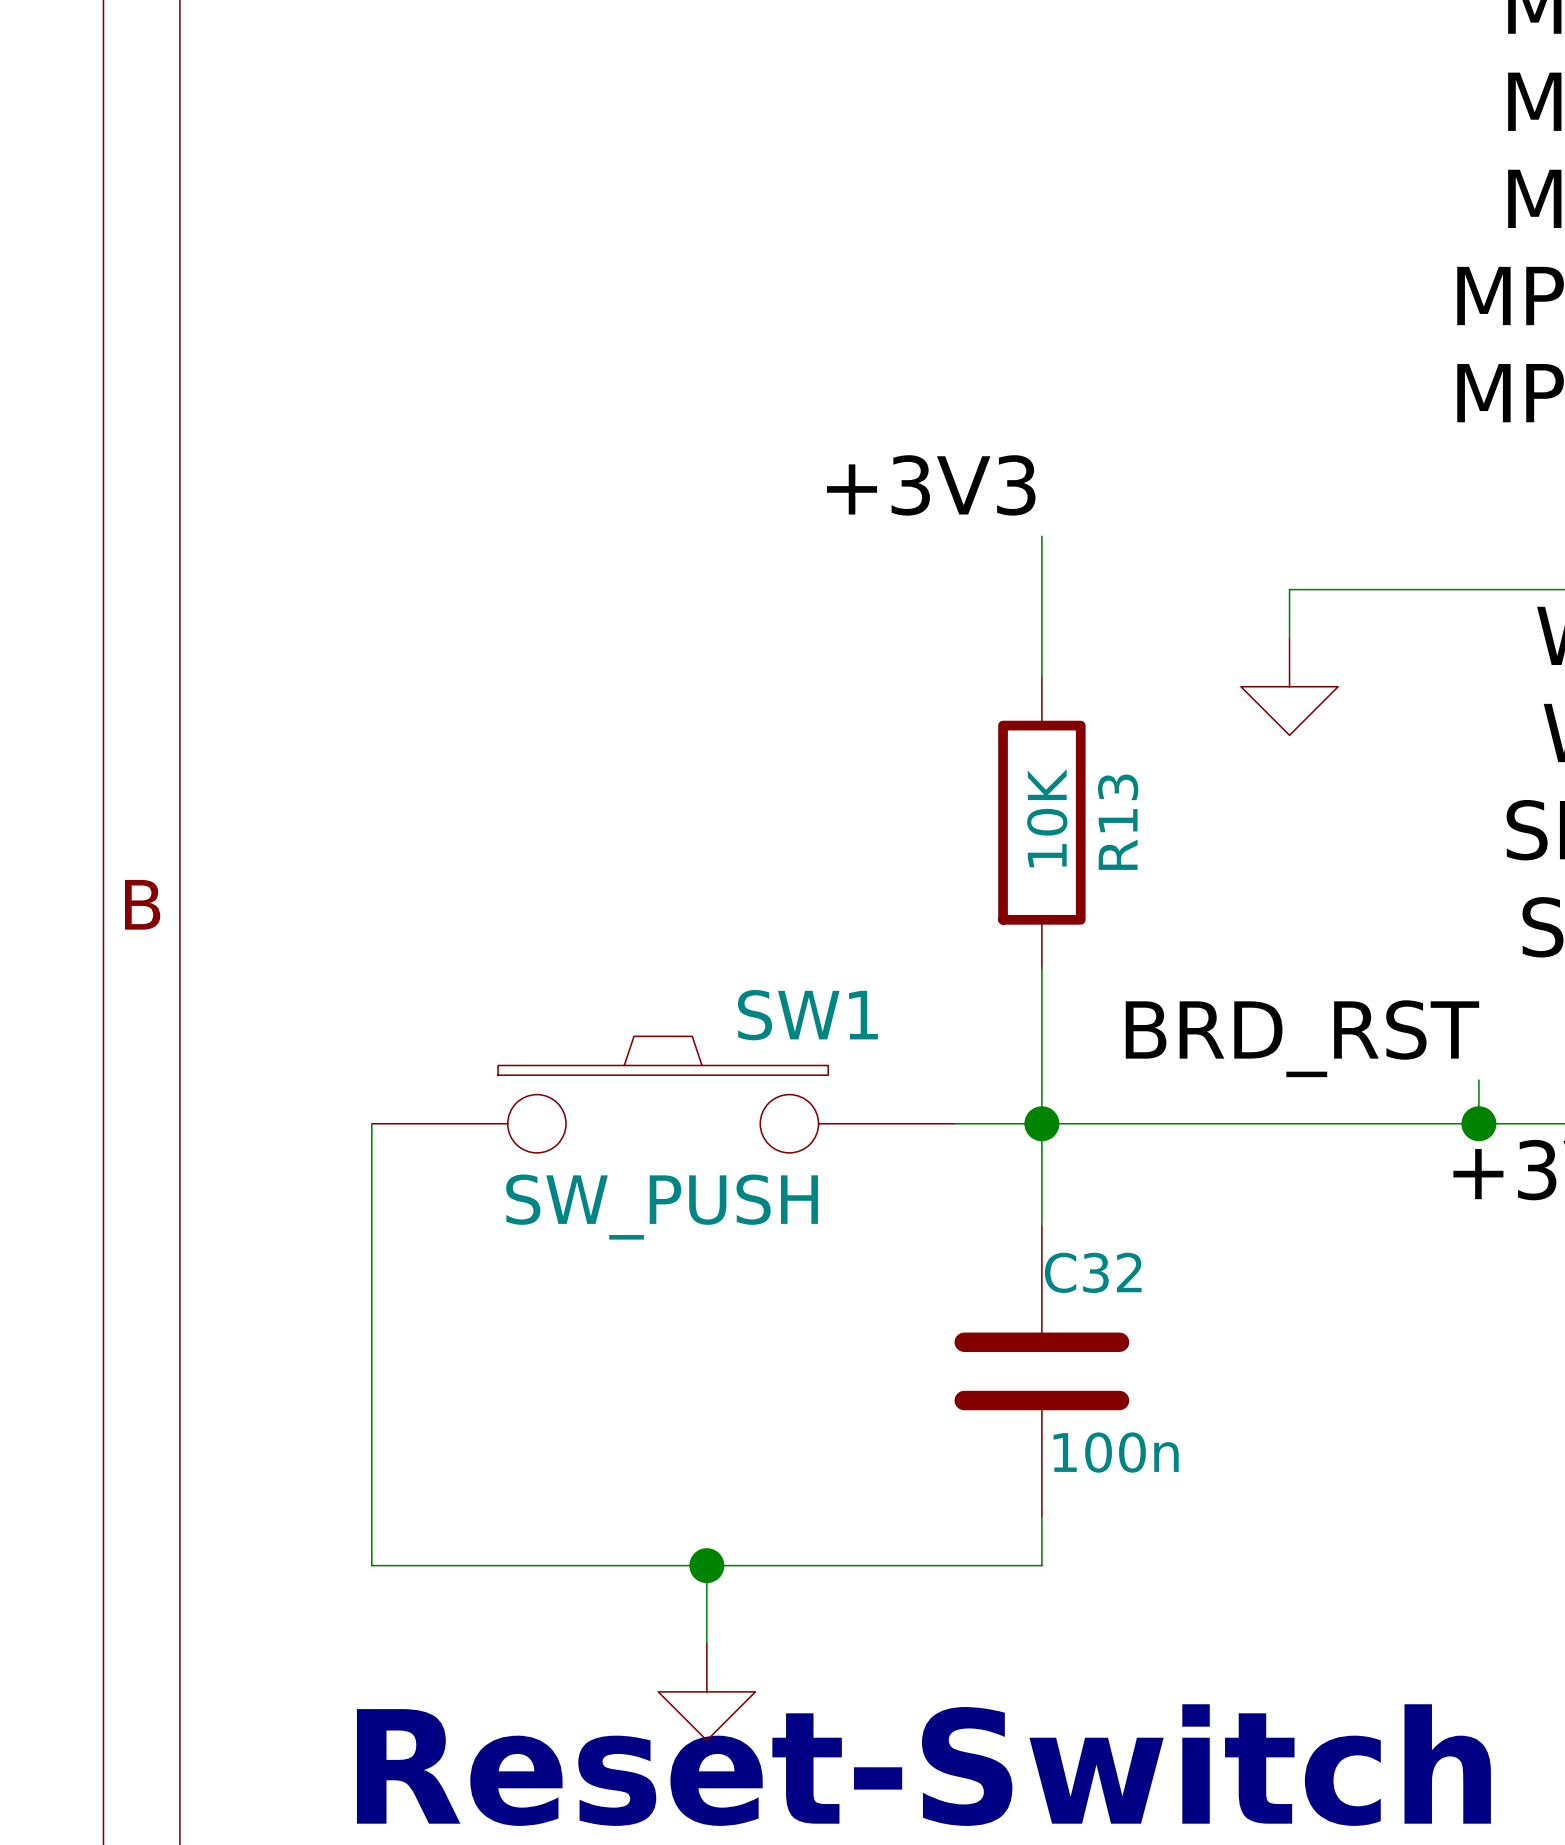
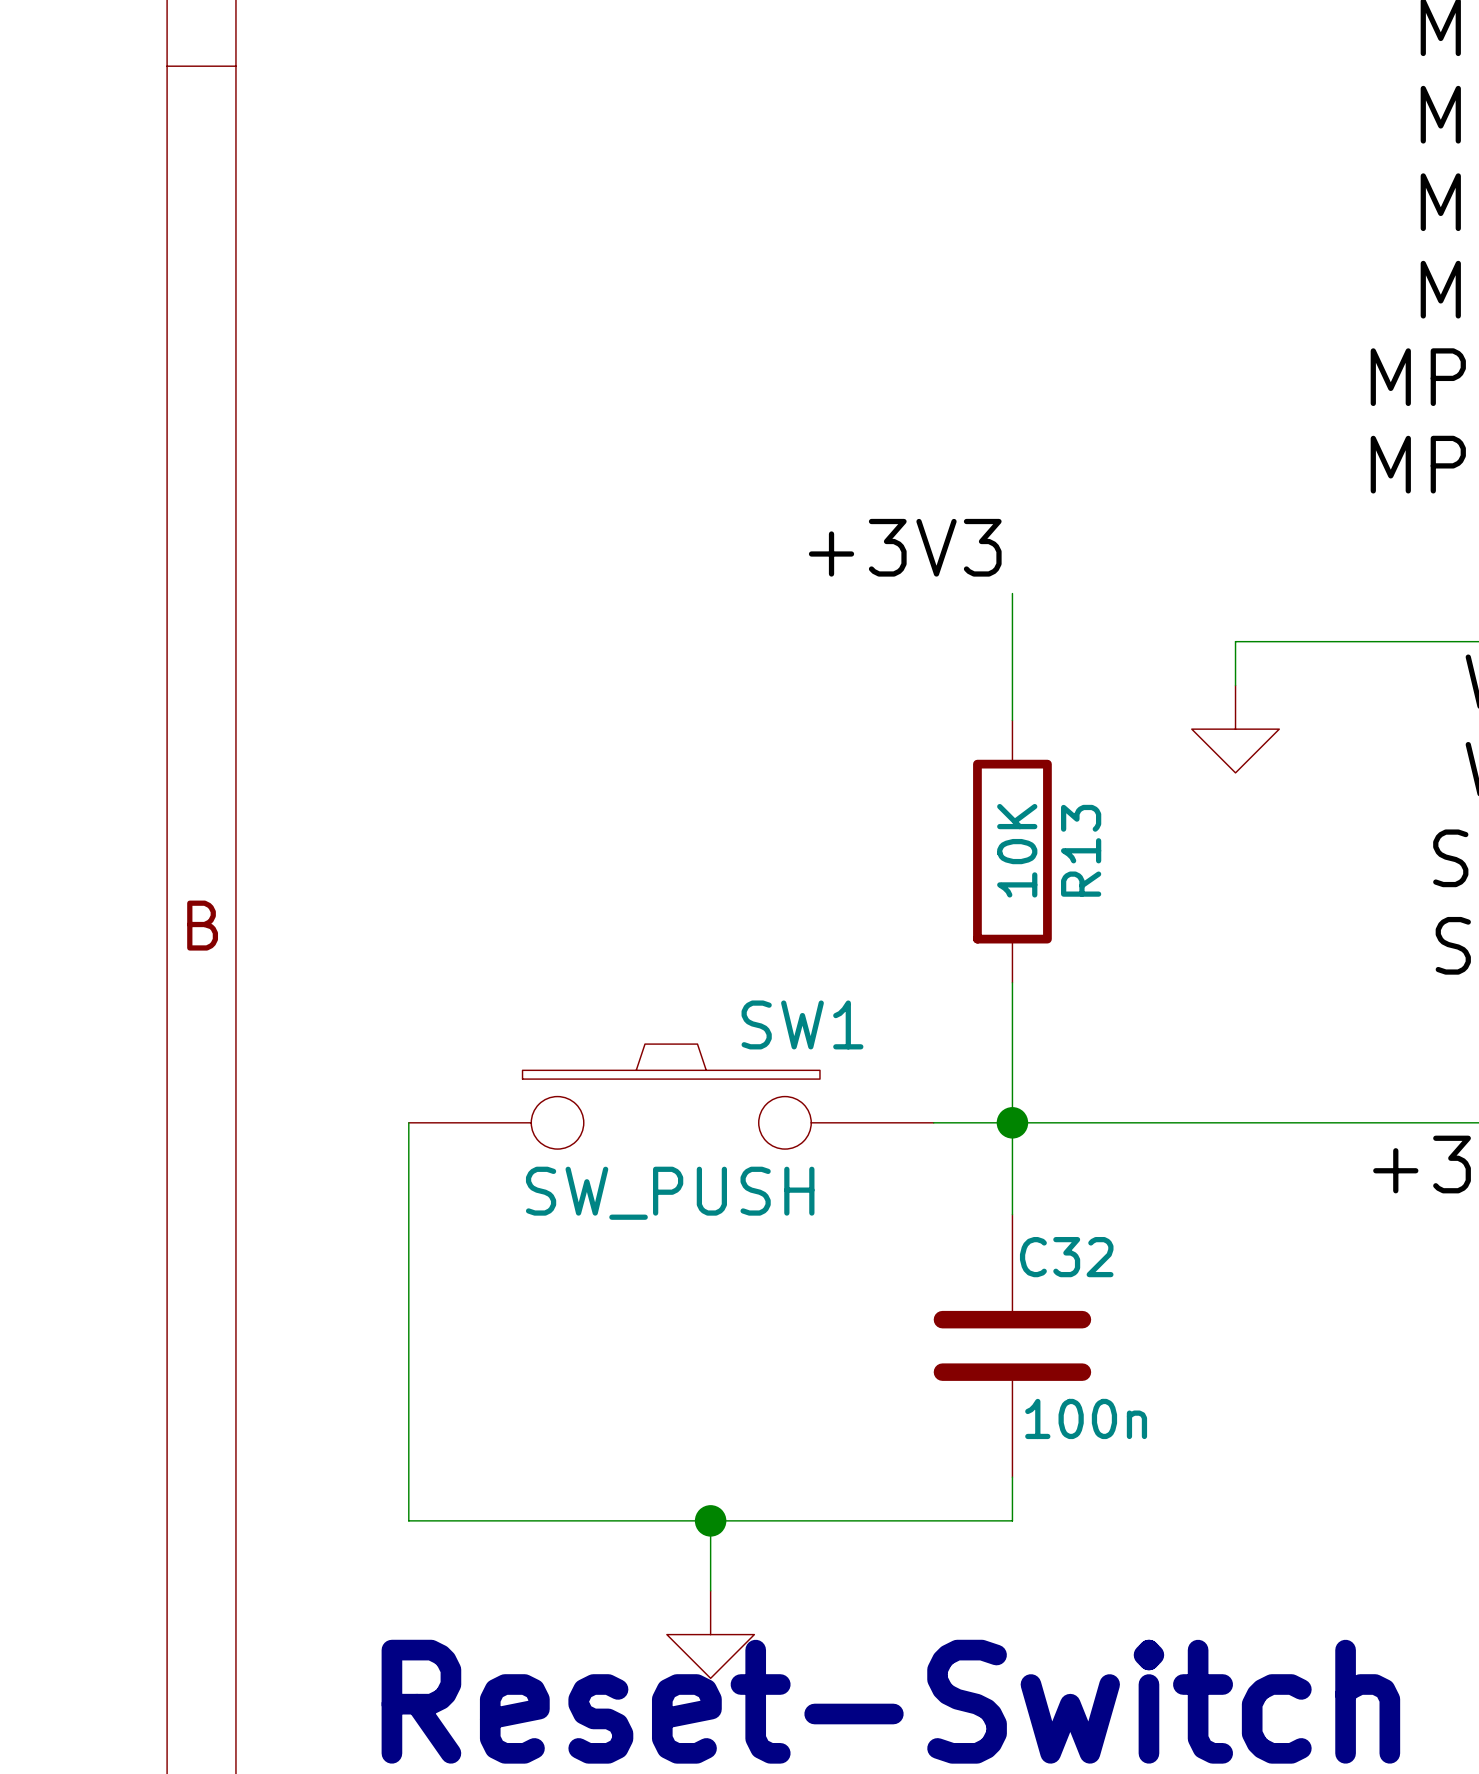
label: BRD_RST (1302, 1038) -> none
wire: (1478, 1080) (1478, 1123) -> none
junction: (1478, 1123) -> none

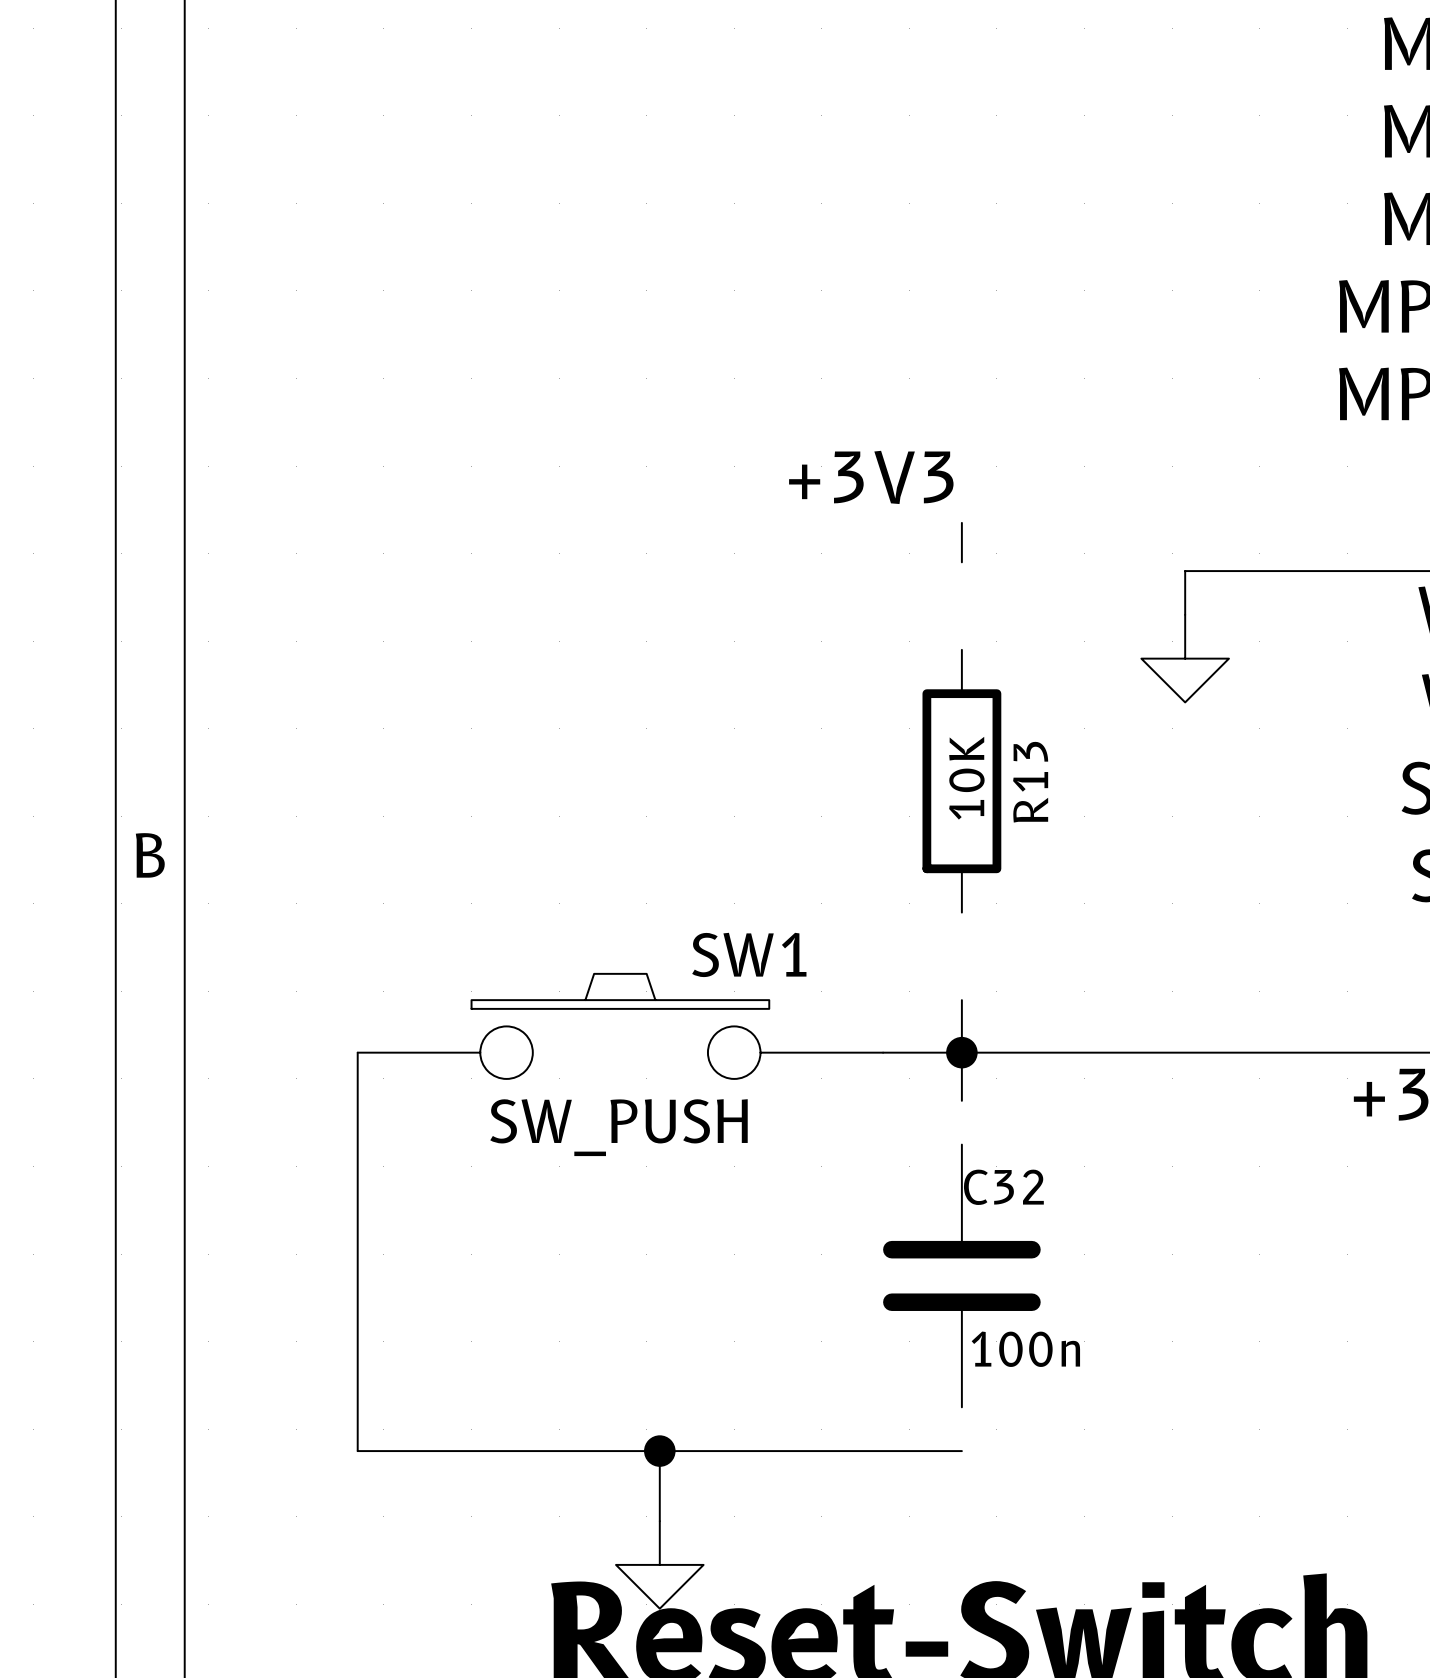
wire: (1012, 632) (1012, 720) -> none
wire: (1012, 982) (1012, 1070) -> none
wire: (1012, 1170) (1012, 1214) -> none
wire: (1012, 1477) (1012, 1520) -> none

